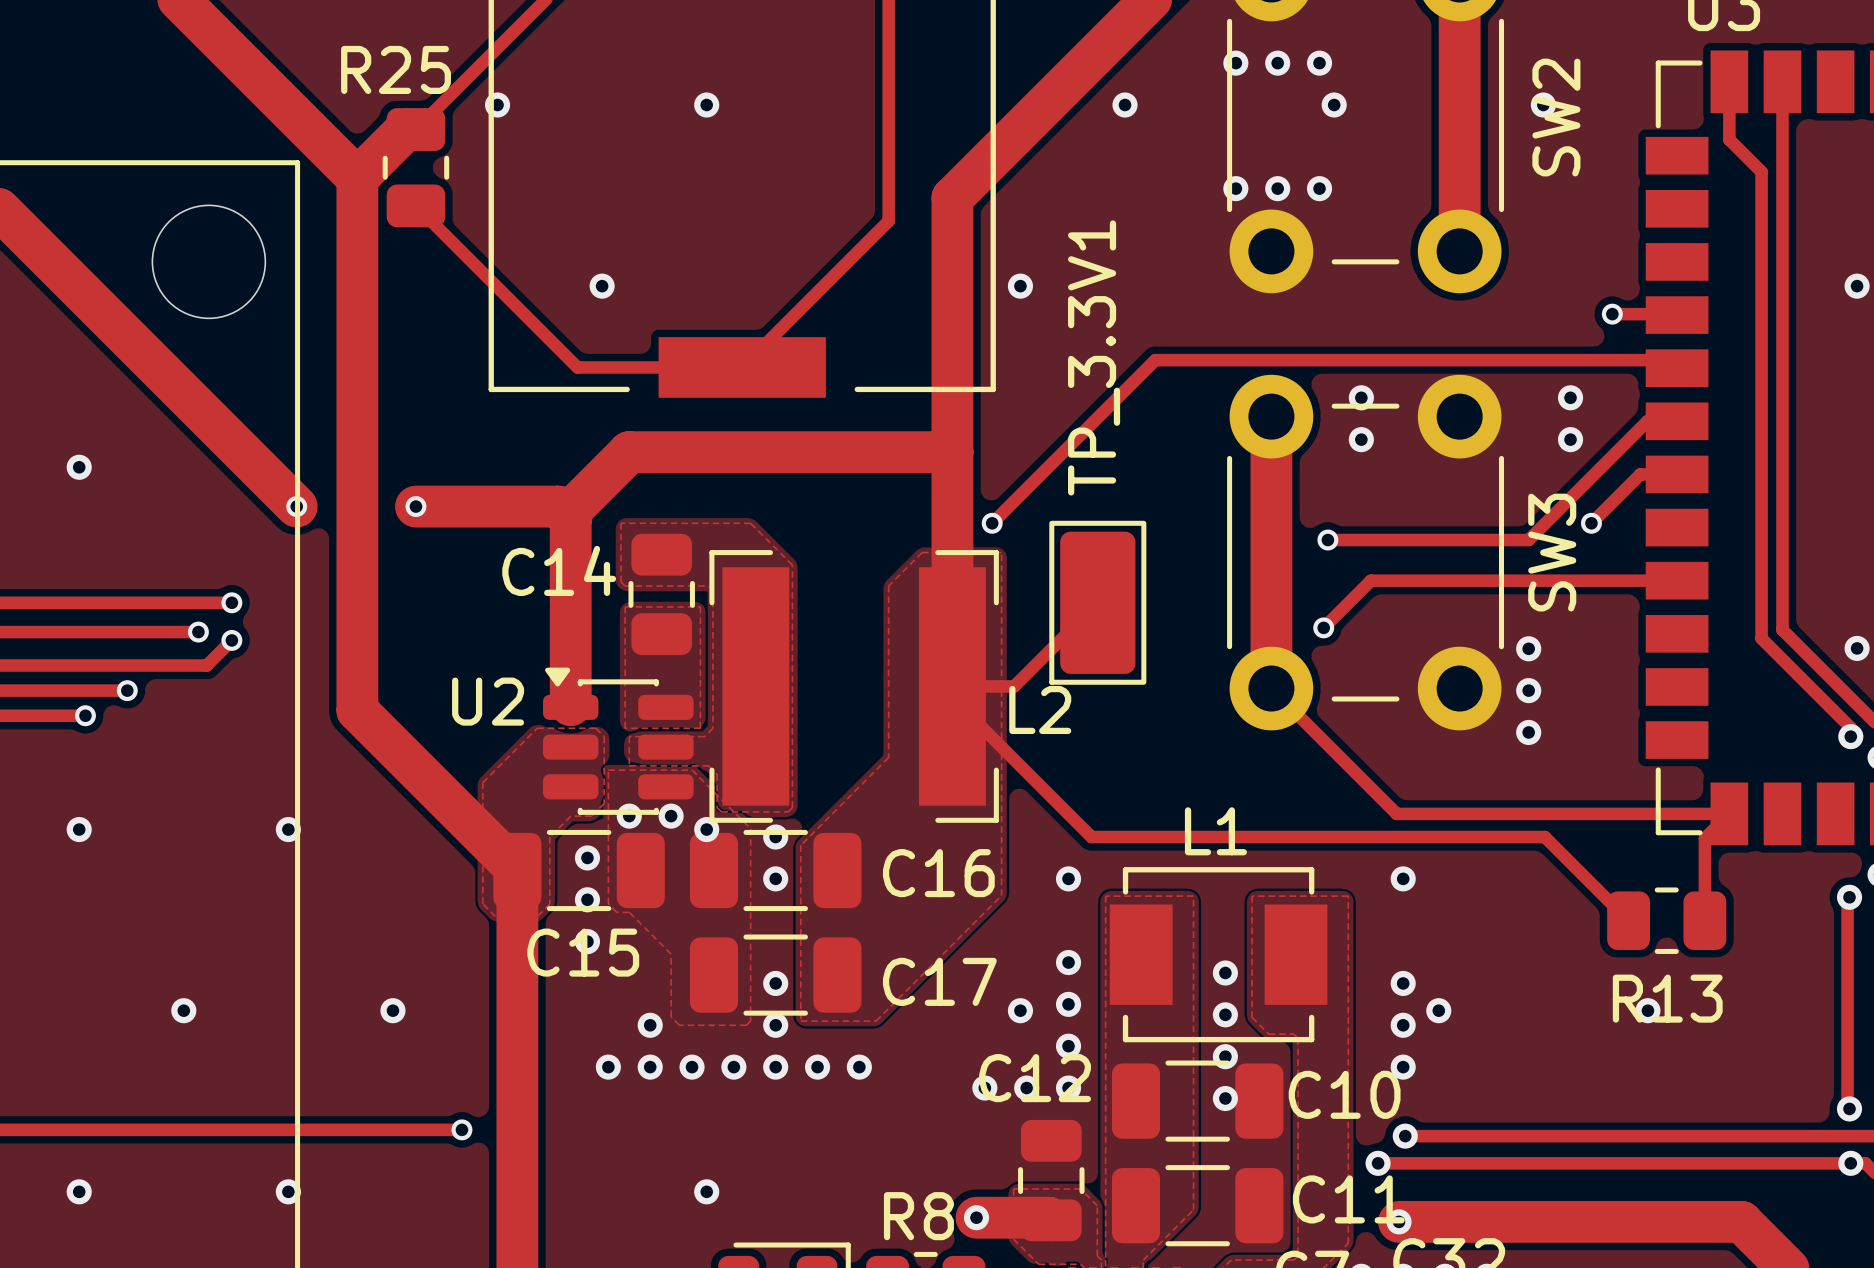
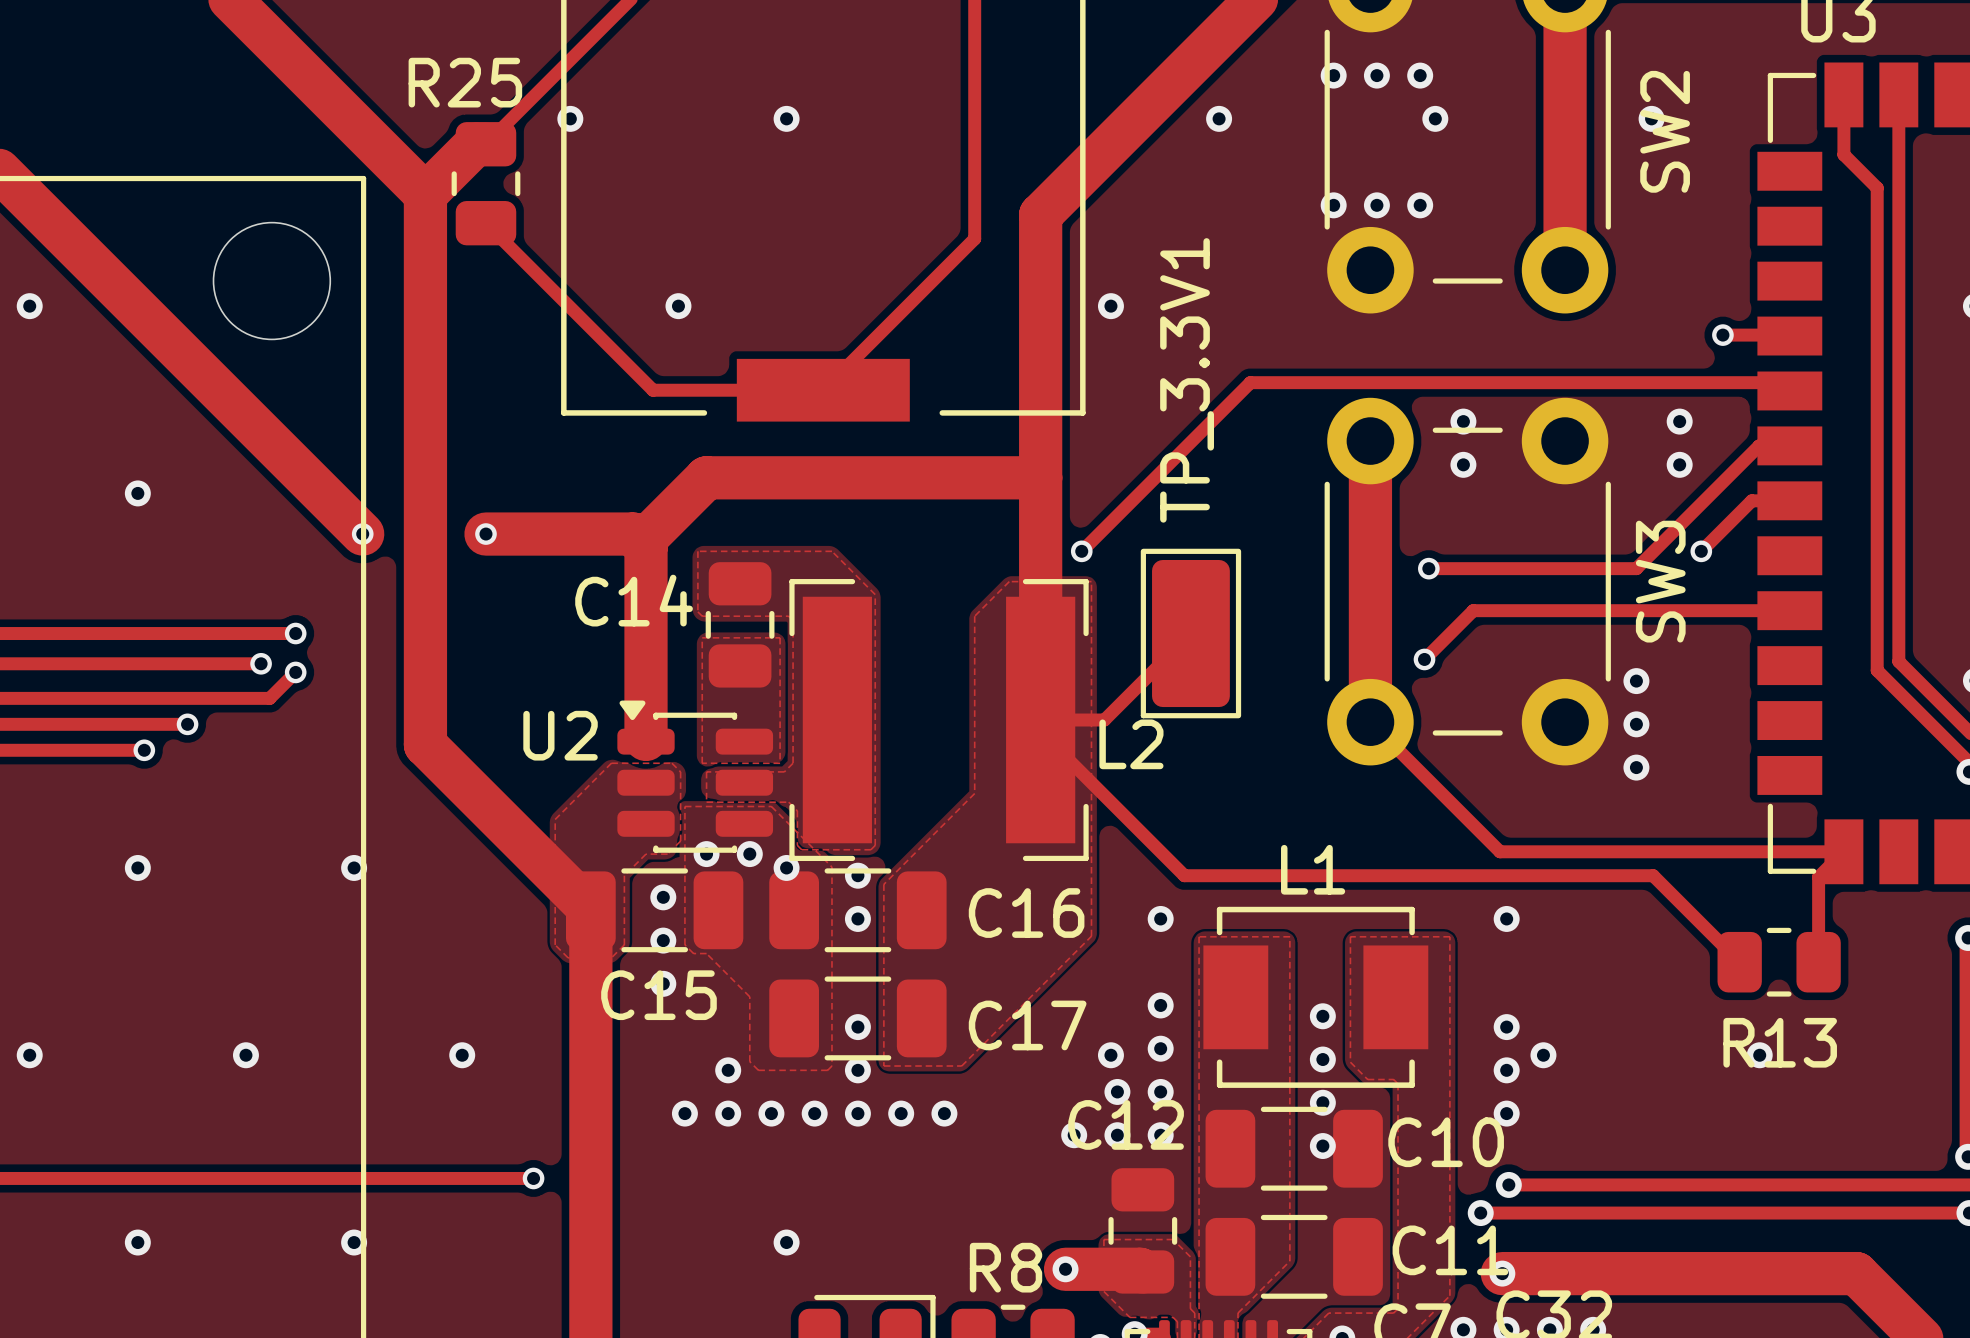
via: none -> (1117, 1091)

